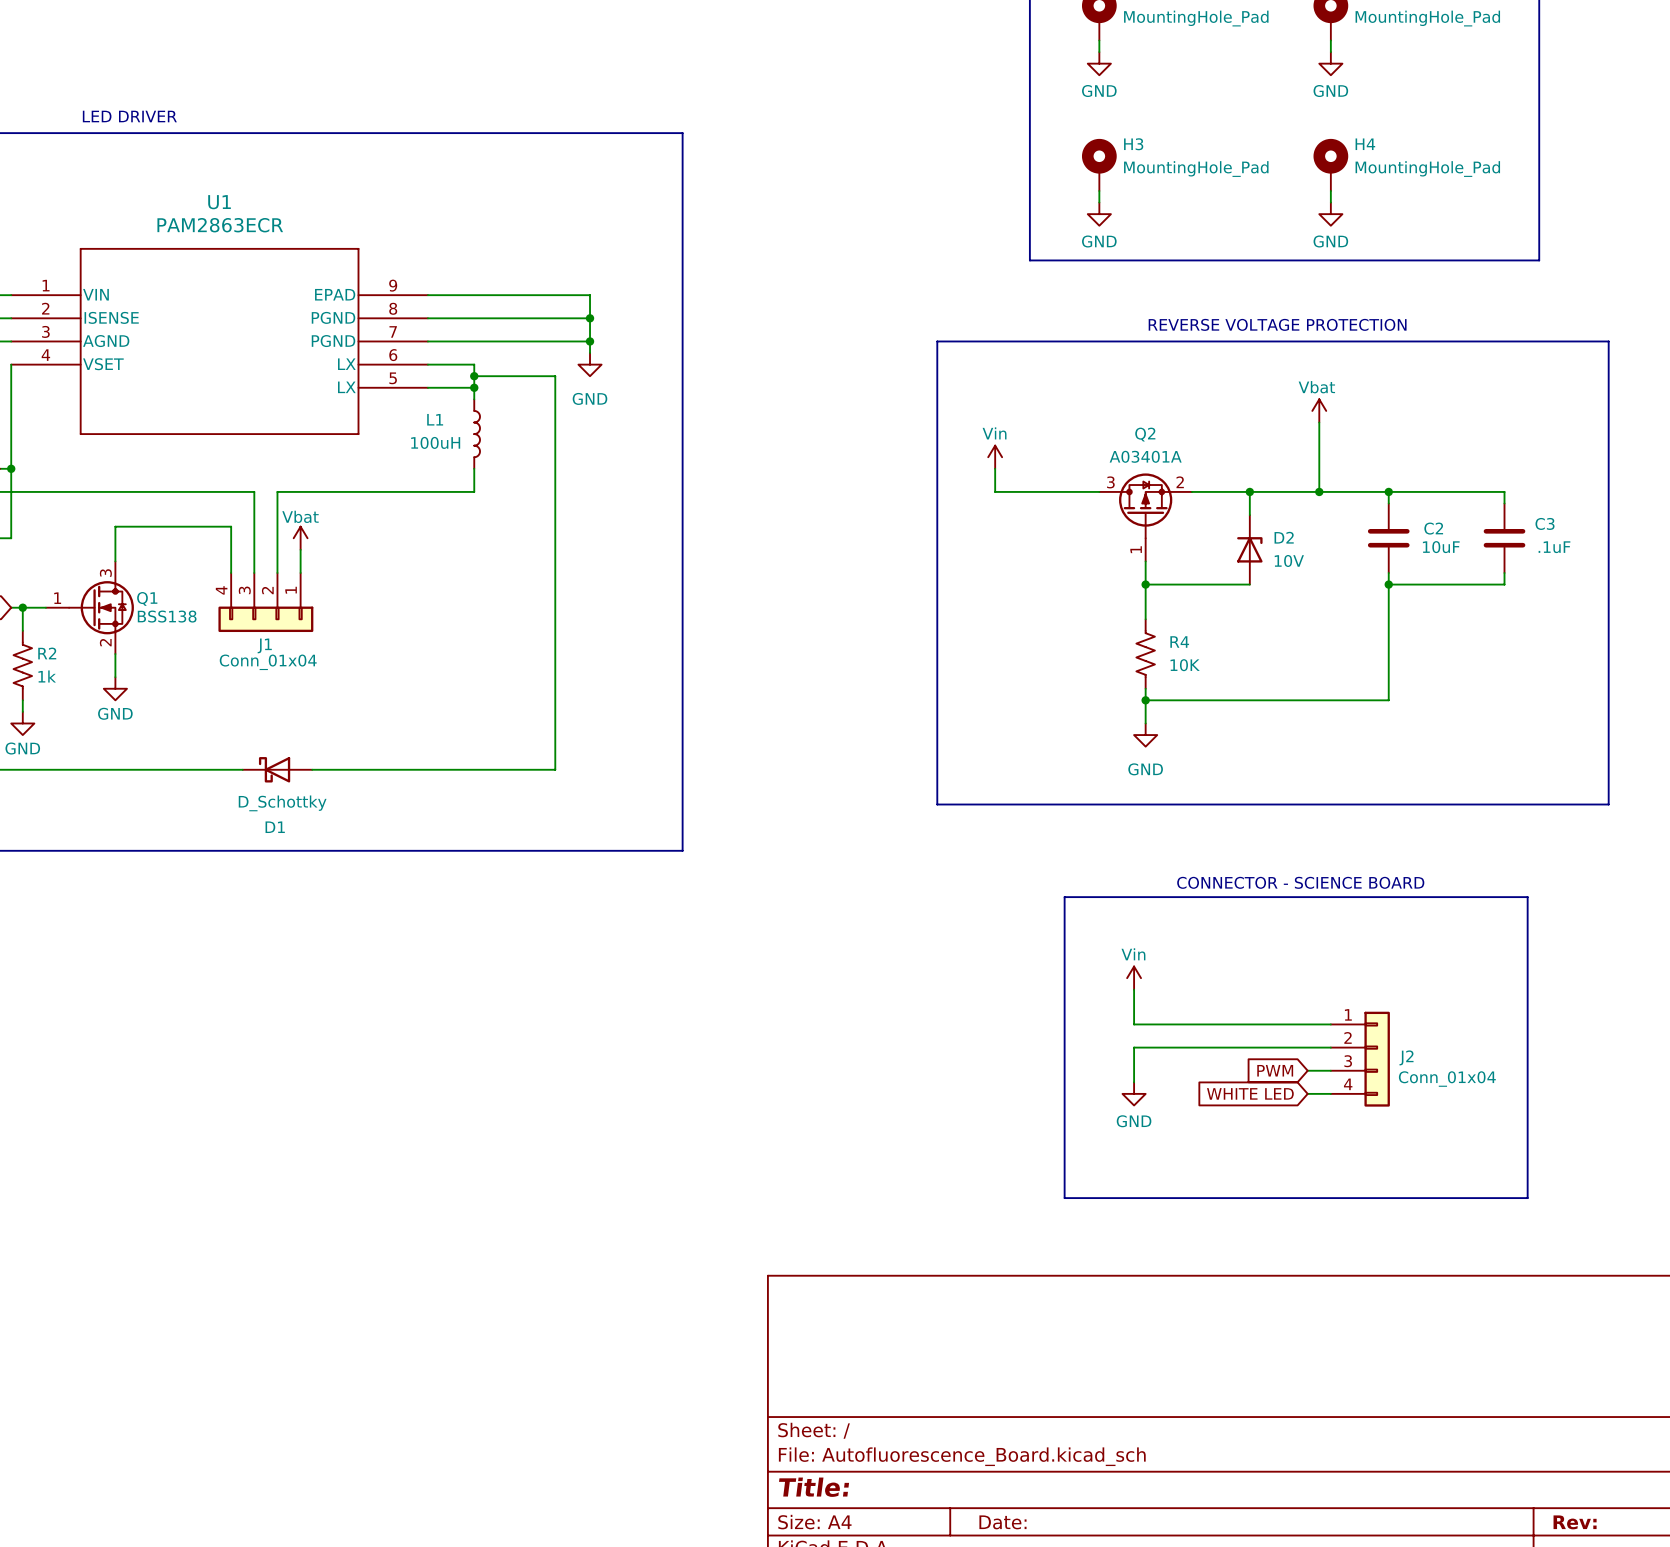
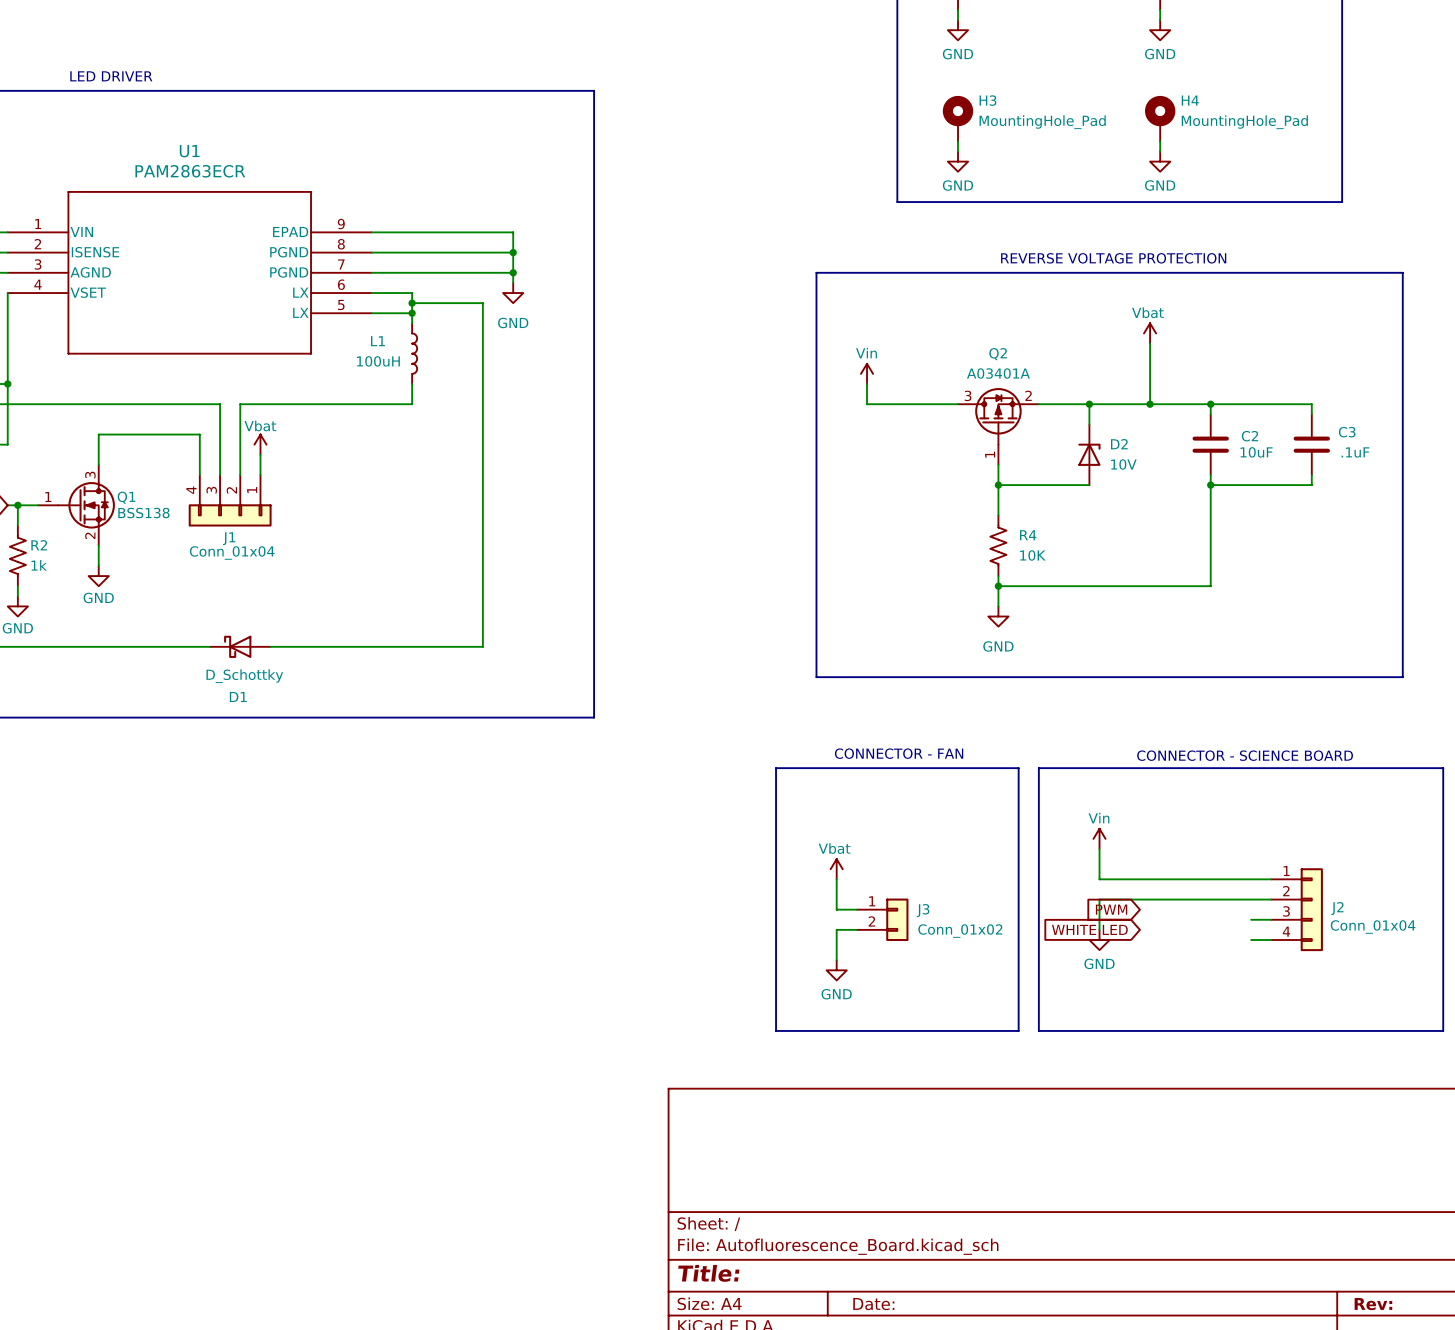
text position: CONNECTOR - SCIENCE BOARD (1300, 882) -> CONNECTOR - SCIENCE BOARD (1245, 755)
text: none -> CONNECTOR - FAN (899, 753)
line: (1064, 897) (1527, 897) (1527, 1198) (1064, 1198) (1064, 897) -> (1038, 768) (1443, 768) (1443, 1030) (1038, 1030) (1038, 768)
line: none -> (776, 768) (1018, 768) (1018, 1030) (776, 1030) (776, 768)
power symbol position: Vin (1134, 978) -> Vin (1099, 838)
wire: (1134, 989) (1134, 1024) (1330, 1024) -> (1099, 849) (1099, 879) (1271, 879)
power symbol: none -> Vbat (836, 869)
wire: none -> (836, 879) (836, 909) (856, 909)
wire: (1330, 1047) (1134, 1047) (1134, 1082) -> (1271, 899) (1099, 899) (1099, 929)
J2 position: (1360, 1059) -> (1297, 909)
wire: (1307, 1070) (1330, 1070) -> (1251, 919) (1271, 919)
J3: none -> Conn_01x02 (882, 919)
wire: none -> (856, 929) (836, 929) (836, 960)
power symbol: GND (1134, 1093) -> none
wire: (1307, 1093) (1330, 1093) -> (1251, 939) (1271, 939)
power symbol: none -> GND (1099, 939)
power symbol: none -> GND (836, 970)

